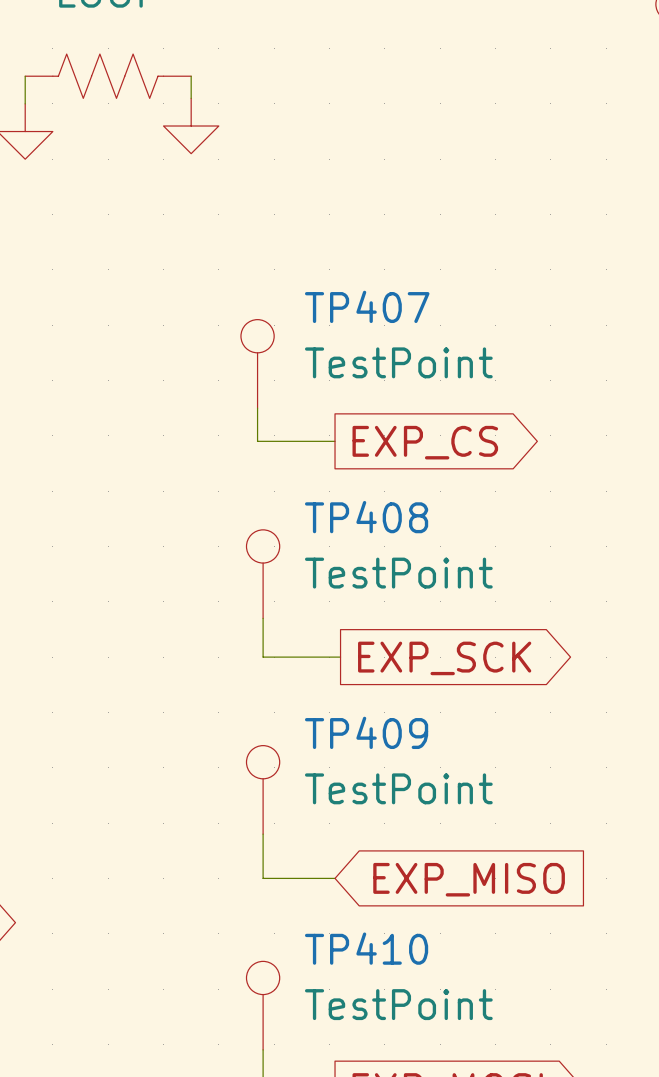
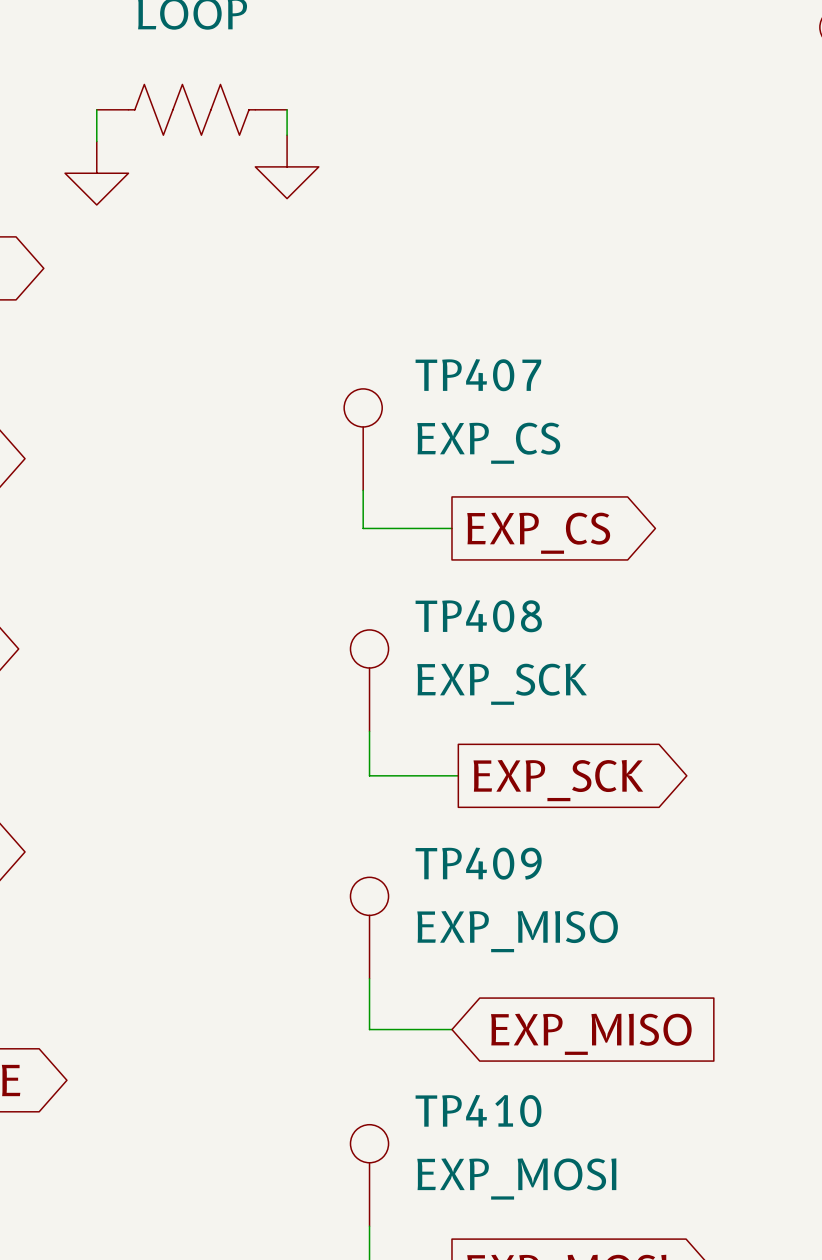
TP407 value: TestPoint (398, 362) -> EXP_CS (488, 443)
TP408 value: TestPoint (398, 573) -> EXP_SCK (502, 684)
TP409 value: TestPoint (398, 788) -> EXP_MISO (517, 931)
TP410 value: TestPoint (398, 1004) -> EXP_MOSI (516, 1179)

